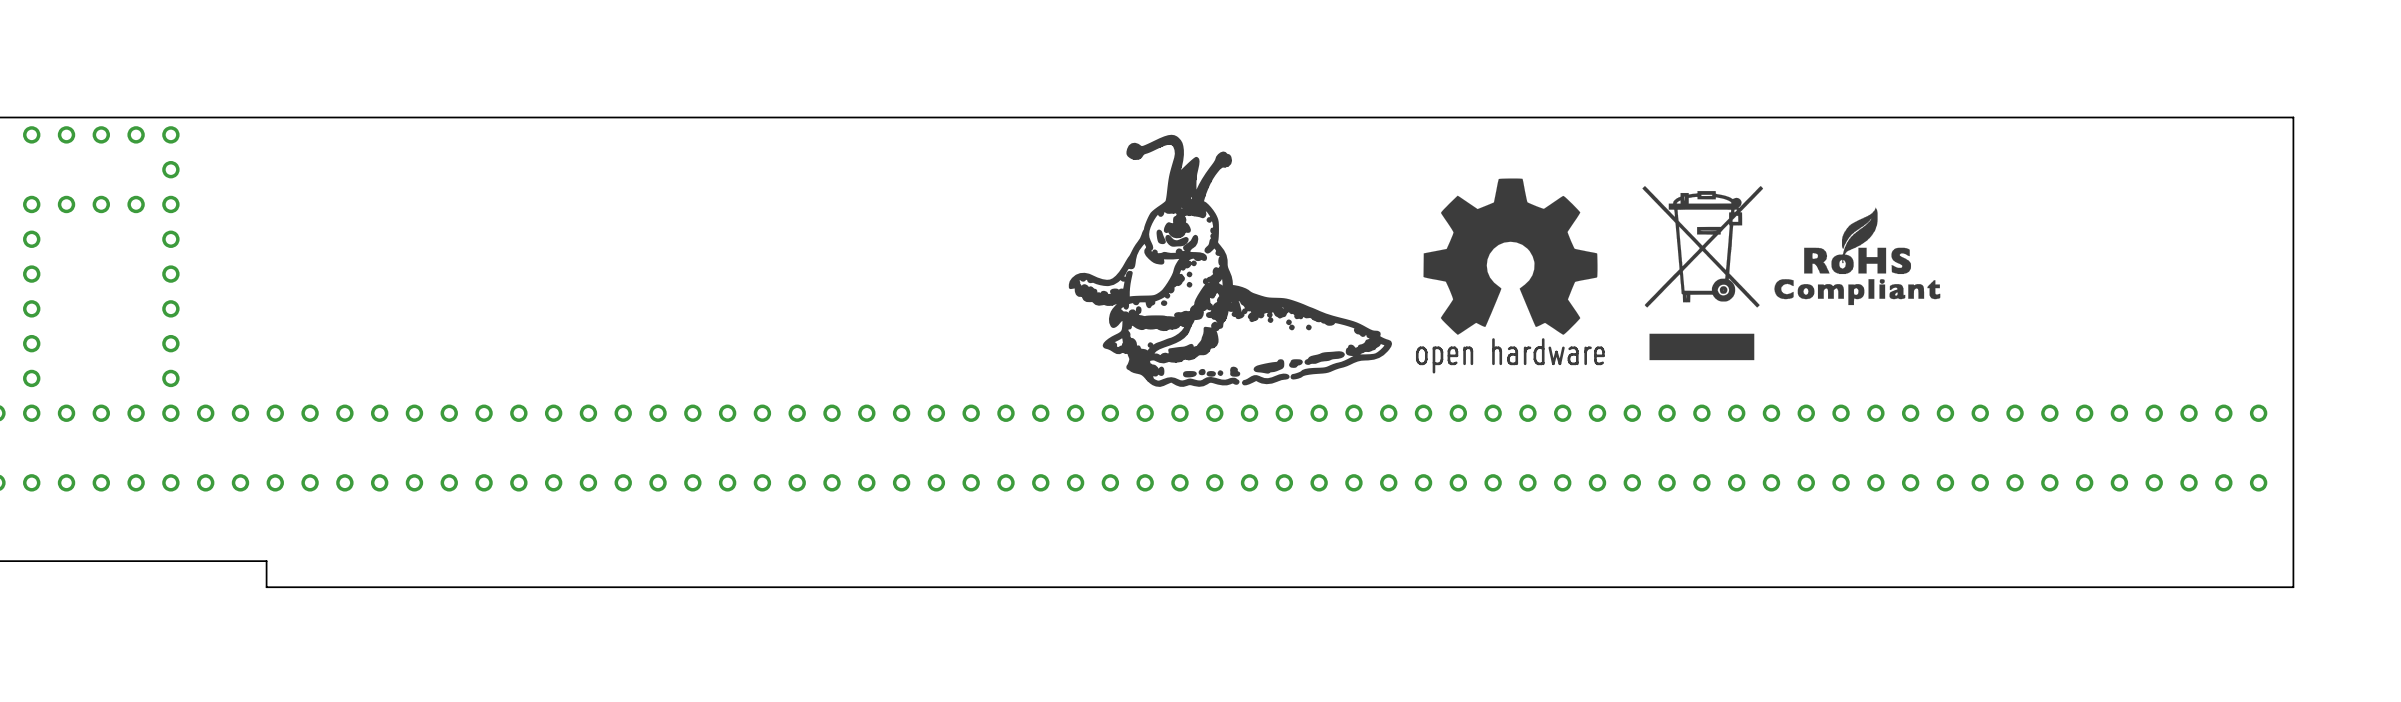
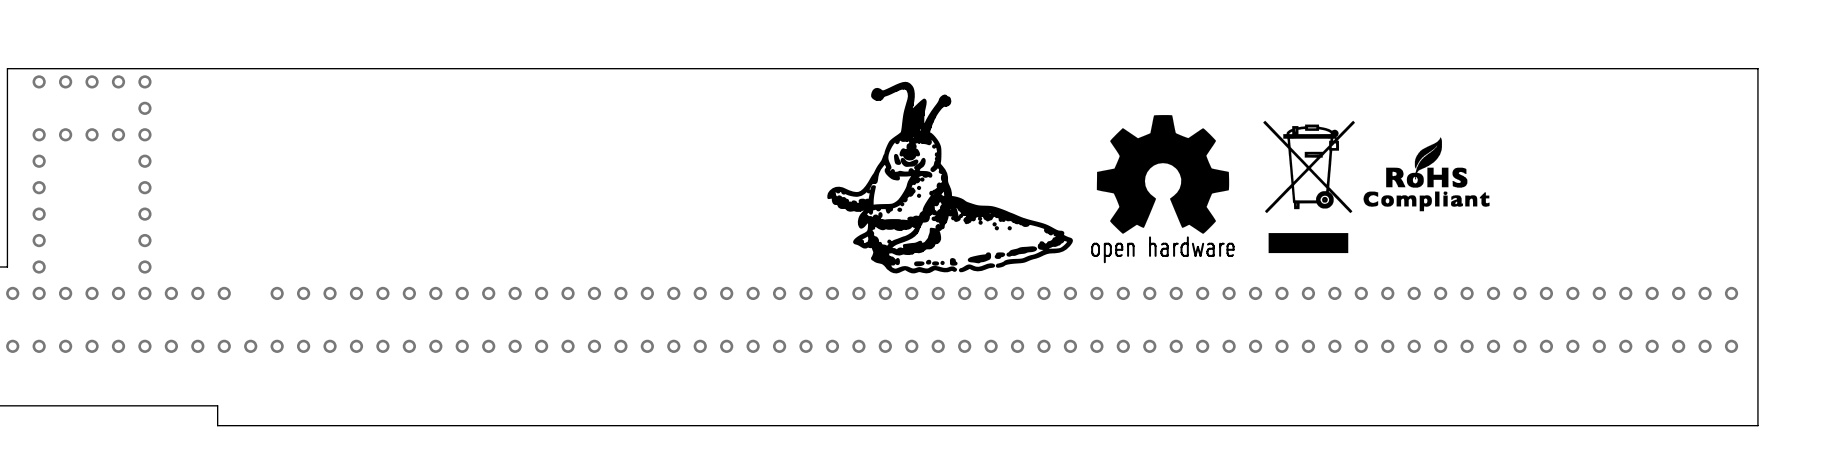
via: (310, 413) -> none

